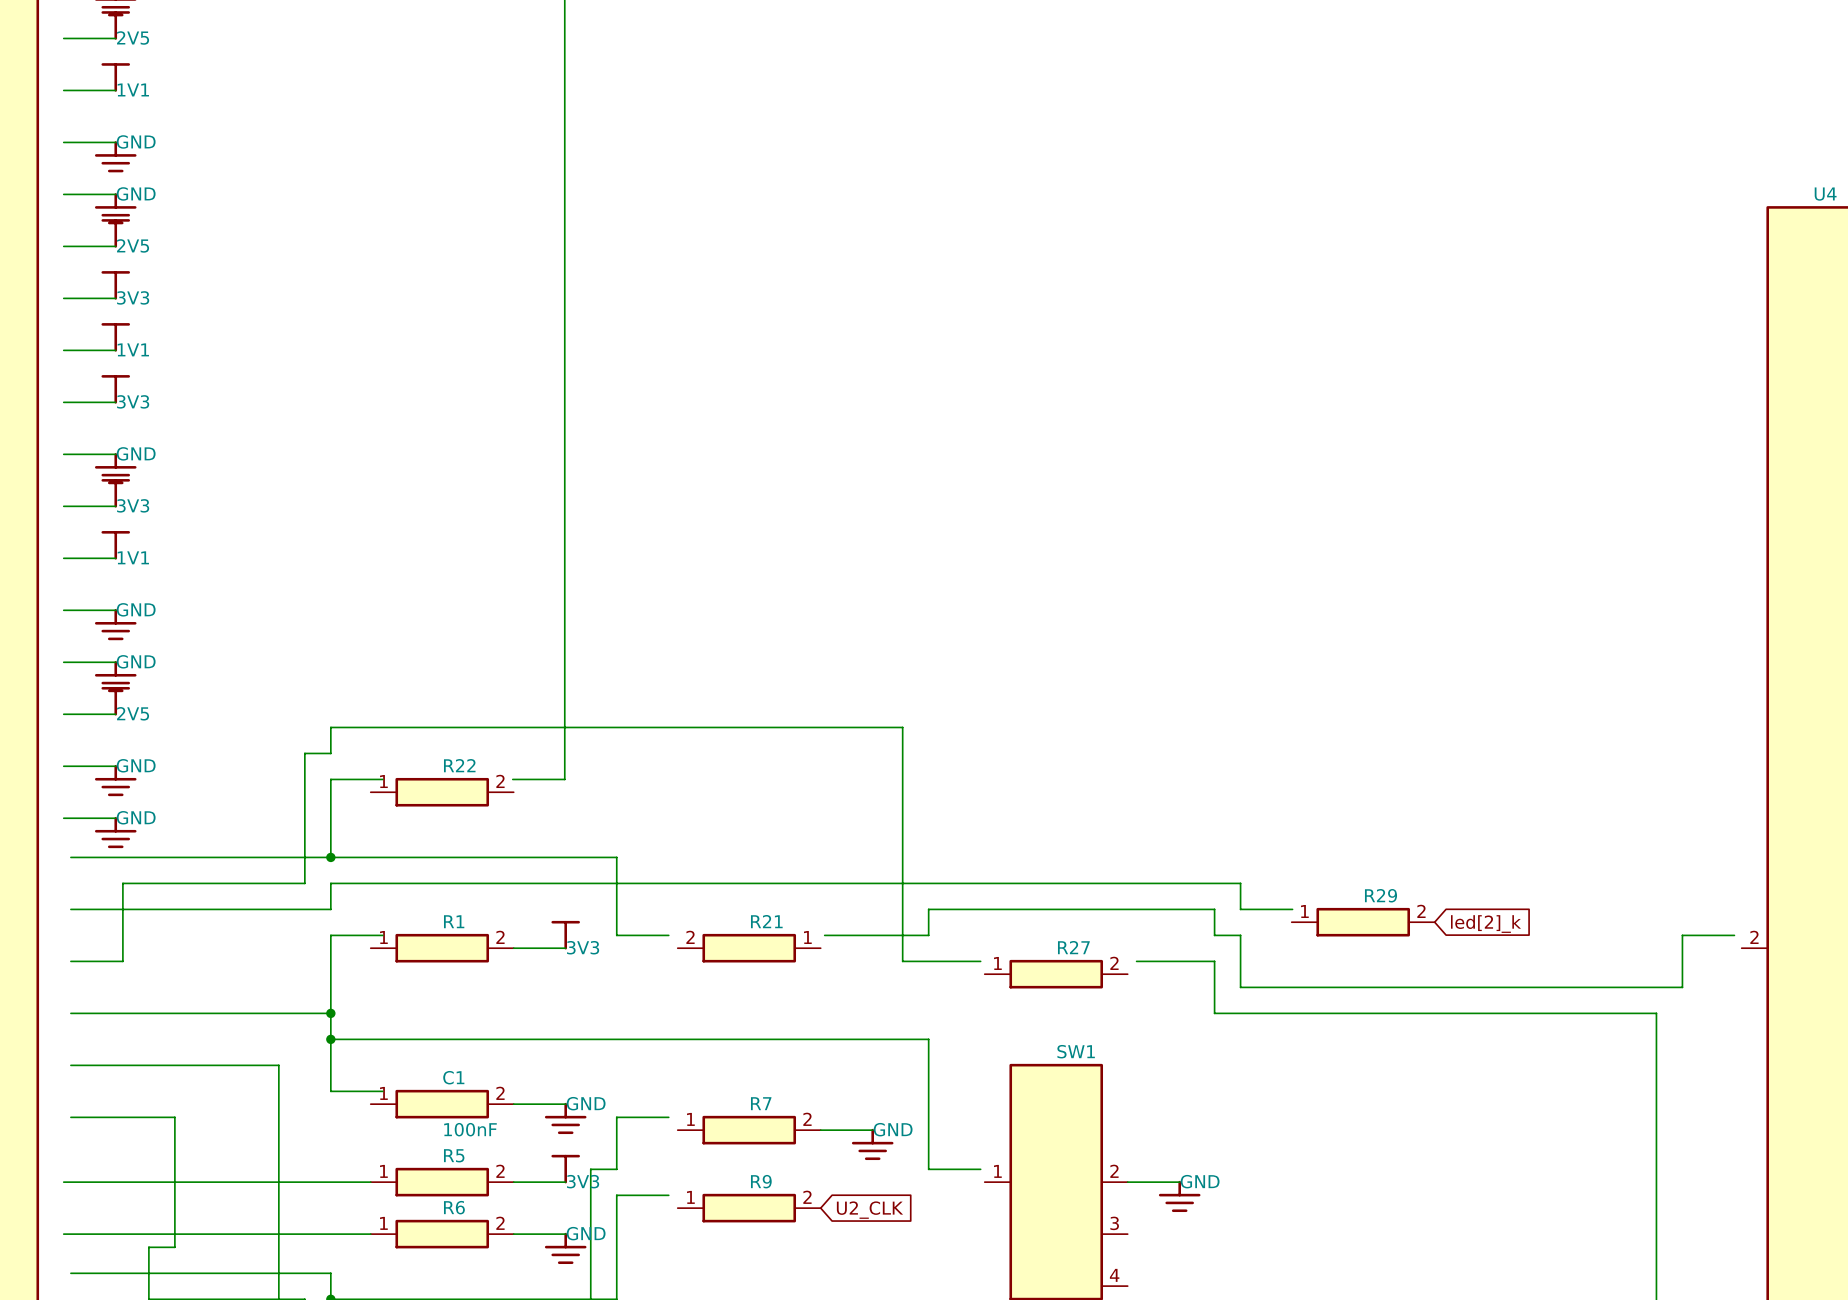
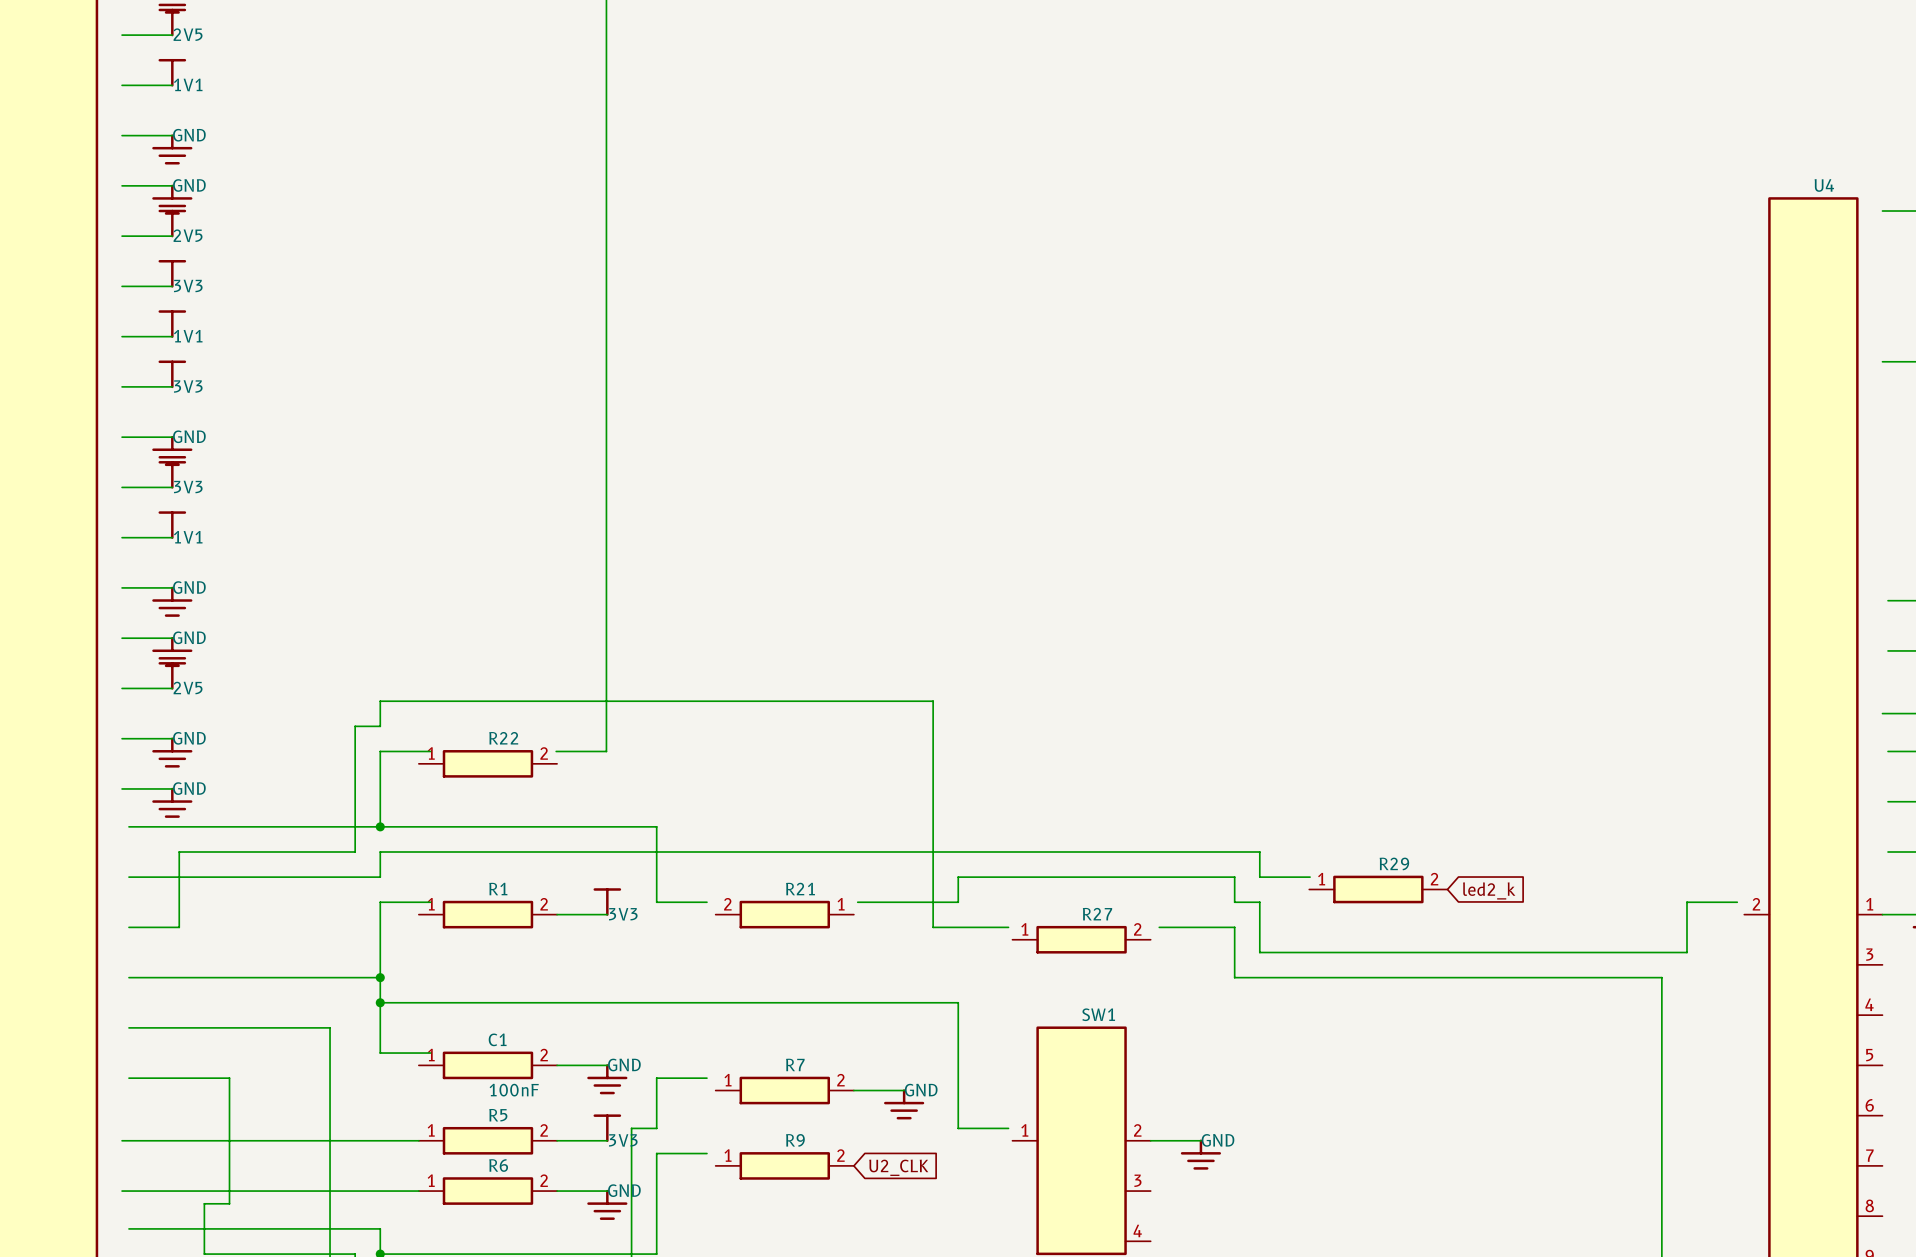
global label: led[2]_k (1485, 924) -> led2_k (1489, 890)

